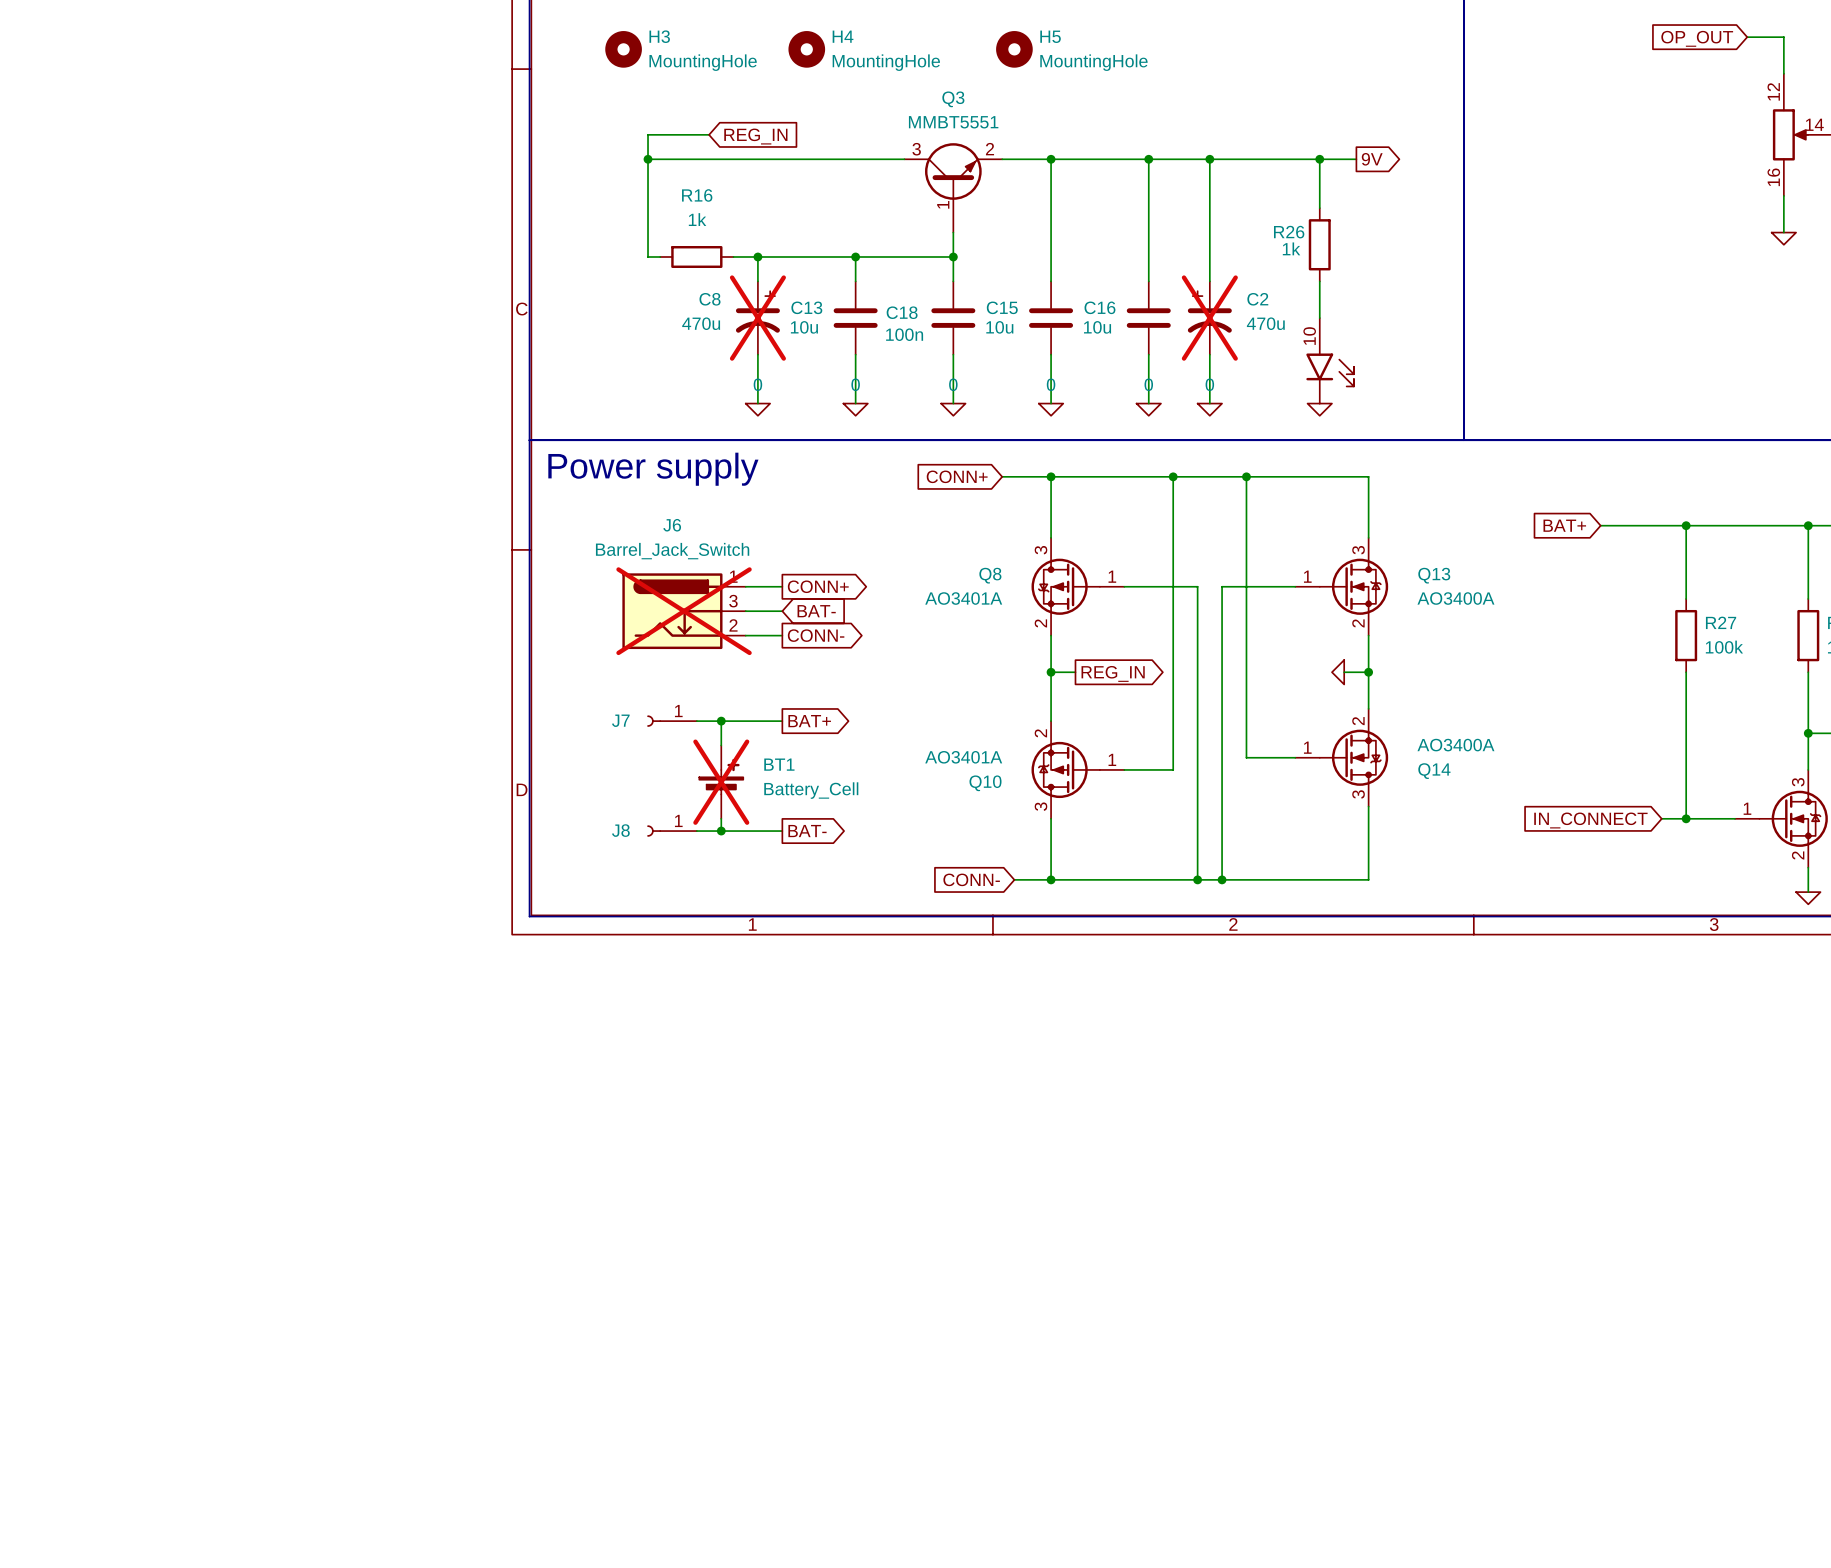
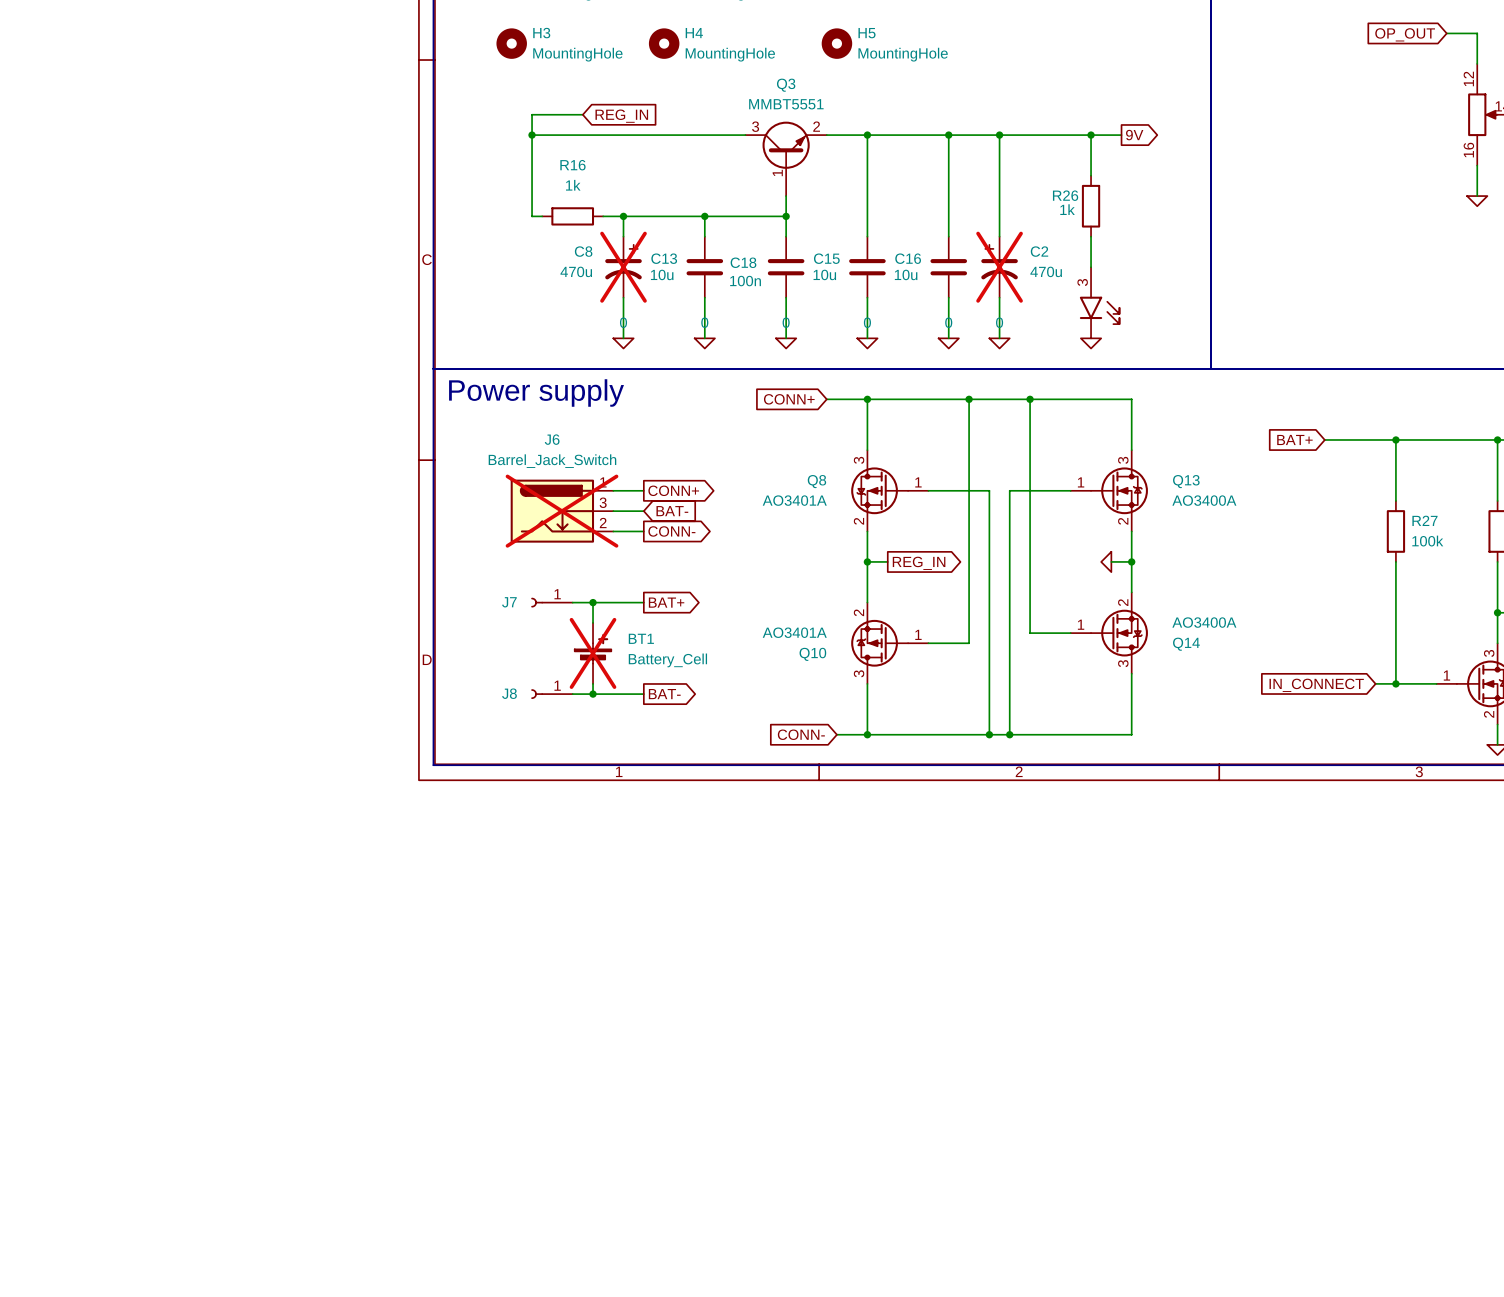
part pin number: 10 (1309, 336) -> 3 (1082, 282)

